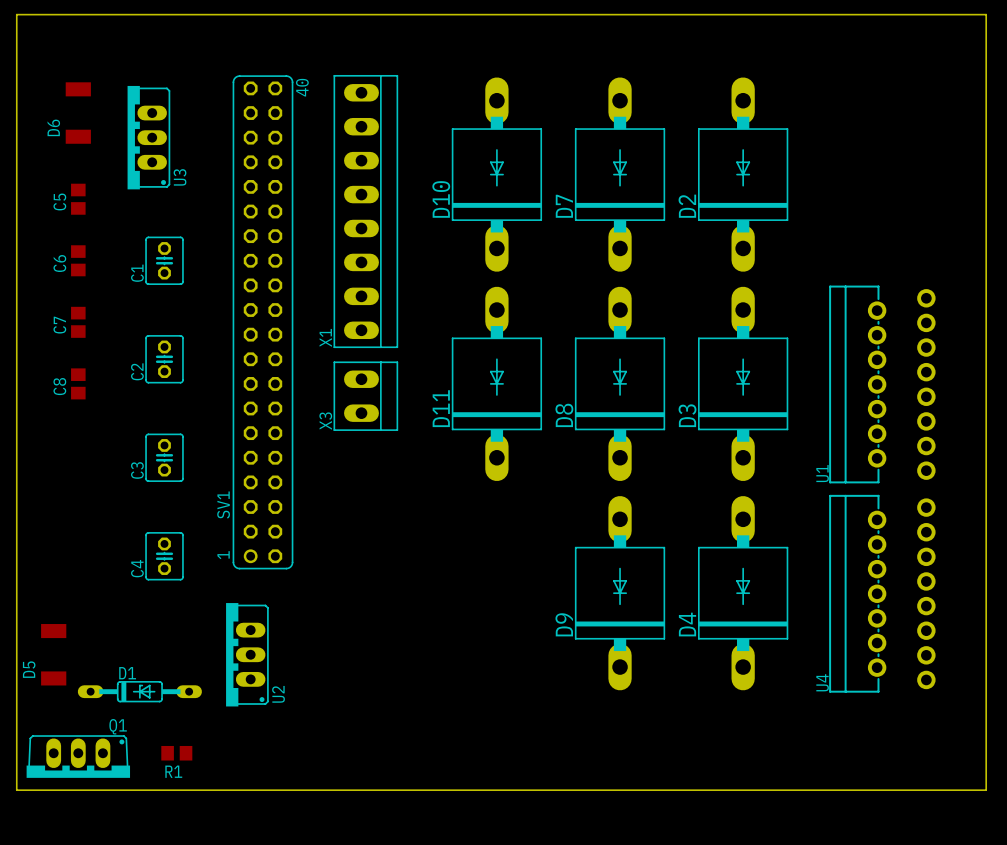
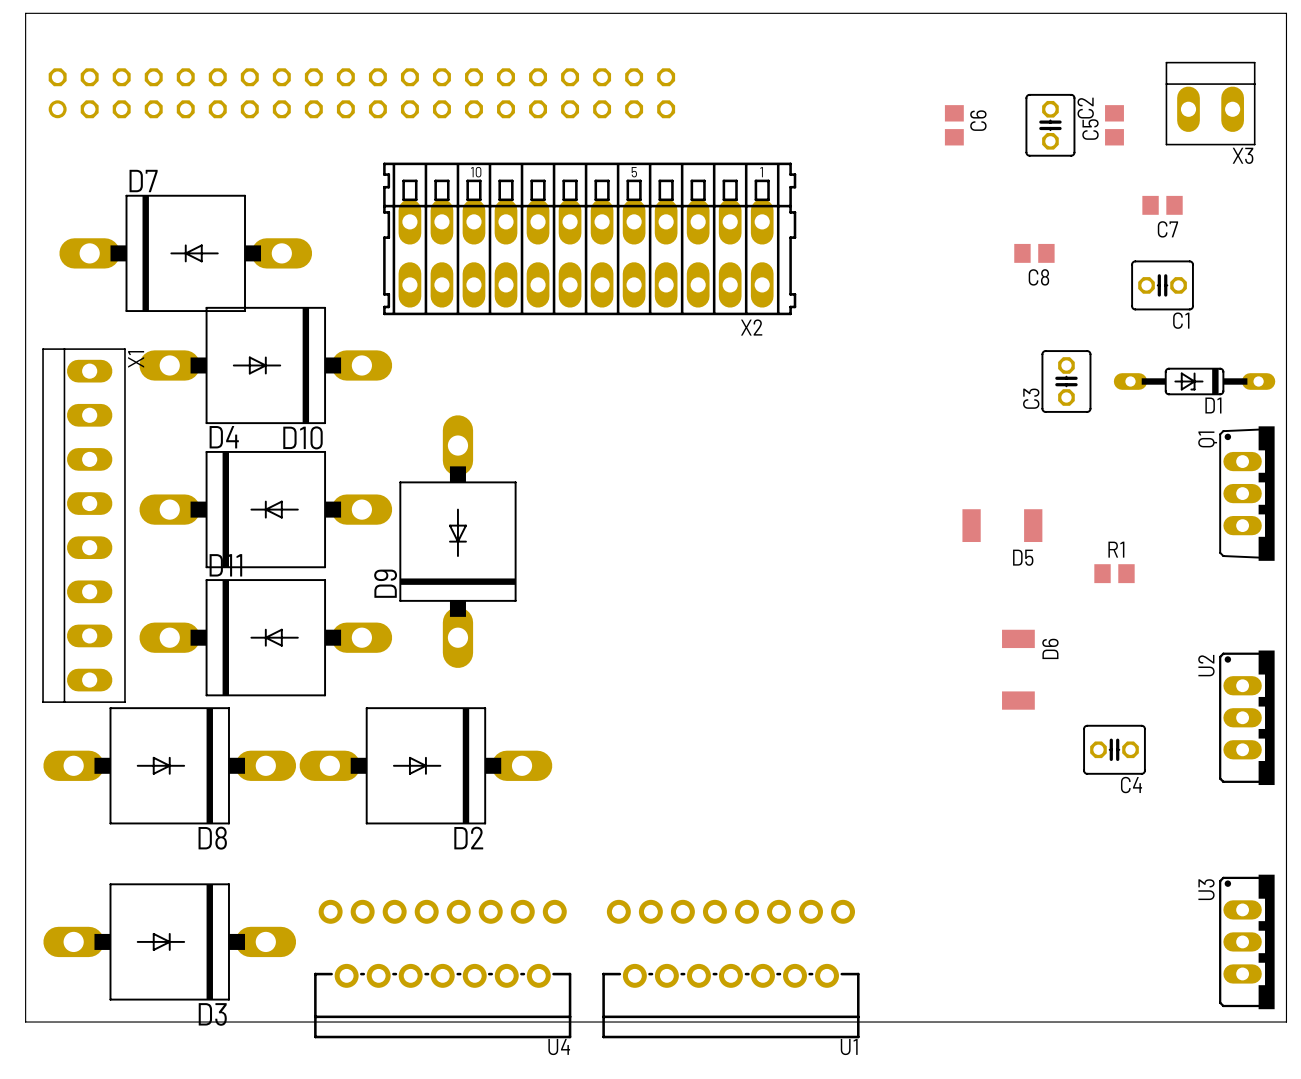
part: none -> (361, 93)
D6 position: (78, 113) -> (1018, 669)
D6 name position: D6 (53, 127) -> D6 (1050, 648)
U3 rotation: 0° (148, 137) -> 180° (1246, 941)
U3 position: (148, 137) -> (1246, 941)
D10 rotation: 0° (496, 174) -> 90° counterclockwise (265, 365)
D10 position: (496, 174) -> (265, 365)
D7 rotation: 0° (620, 174) -> 90° clockwise (185, 253)
D7 position: (620, 174) -> (185, 253)
D2 rotation: 0° (743, 174) -> 90° counterclockwise (425, 765)
D2 position: (743, 174) -> (425, 765)
X2: none -> (589, 238)
C5 position: (78, 199) -> (1114, 125)
X1 rotation: 0° (365, 211) -> 180° (84, 525)
X1 position: (365, 211) -> (84, 525)
C6 position: (78, 260) -> (954, 125)
C1 rotation: 0° (164, 260) -> 90° clockwise (1162, 285)
C1 position: (164, 260) -> (1162, 285)
C6 name position: C6 (59, 263) -> C6 (978, 120)
C1 name position: C1 (137, 273) -> C1 (1181, 320)
C7 rotation: 0° (78, 322) -> 90° clockwise (1162, 205)
C7 position: (78, 322) -> (1162, 205)
SV1: (262, 322) -> none
C7 name position: C7 (59, 325) -> C7 (1167, 229)
C2 position: (164, 359) -> (1050, 125)
C2 name position: C2 (137, 371) -> C2 (1085, 108)
C8 rotation: 0° (78, 383) -> 90° clockwise (1034, 253)
C8 position: (78, 383) -> (1034, 253)
D11 rotation: 0° (496, 383) -> 90° clockwise (265, 637)
D11 position: (496, 383) -> (265, 637)
D8 rotation: 0° (620, 383) -> 90° counterclockwise (169, 765)
D8 position: (620, 383) -> (169, 765)
D3 rotation: 0° (743, 383) -> 90° counterclockwise (169, 941)
D3 position: (743, 383) -> (169, 941)
U1 rotation: 0° (882, 384) -> 90° counterclockwise (730, 969)
U1 position: (882, 384) -> (730, 969)
C8 name position: C8 (59, 386) -> C8 (1038, 277)
X3 rotation: 0° (365, 396) -> 90° counterclockwise (1210, 103)
X3 position: (365, 396) -> (1210, 103)
C3 position: (164, 457) -> (1066, 381)
C4 rotation: 0° (164, 556) -> 90° clockwise (1114, 749)
C4 position: (164, 556) -> (1114, 749)
C4 name position: C4 (137, 568) -> C4 (1131, 785)
D9 position: (620, 593) -> (457, 541)
D4 rotation: 0° (743, 593) -> 90° clockwise (265, 509)
D4 position: (743, 593) -> (265, 509)
U4 rotation: 0° (882, 593) -> 90° counterclockwise (442, 969)
U4 position: (882, 593) -> (442, 969)
D5 rotation: 0° (53, 654) -> 90° clockwise (1002, 525)
D5 position: (53, 654) -> (1002, 525)
U2 rotation: 0° (247, 654) -> 180° (1246, 717)
U2 position: (247, 654) -> (1246, 717)
D5 name position: D5 (29, 669) -> D5 (1023, 557)
D1 rotation: 0° (139, 691) -> 180° (1194, 381)
D1 position: (139, 691) -> (1194, 381)
R1 position: (176, 753) -> (1114, 573)
Q1 rotation: 0° (78, 756) -> 90° counterclockwise (1246, 493)
Q1 position: (78, 756) -> (1246, 493)
R1 name position: R1 (173, 771) -> R1 (1116, 549)

